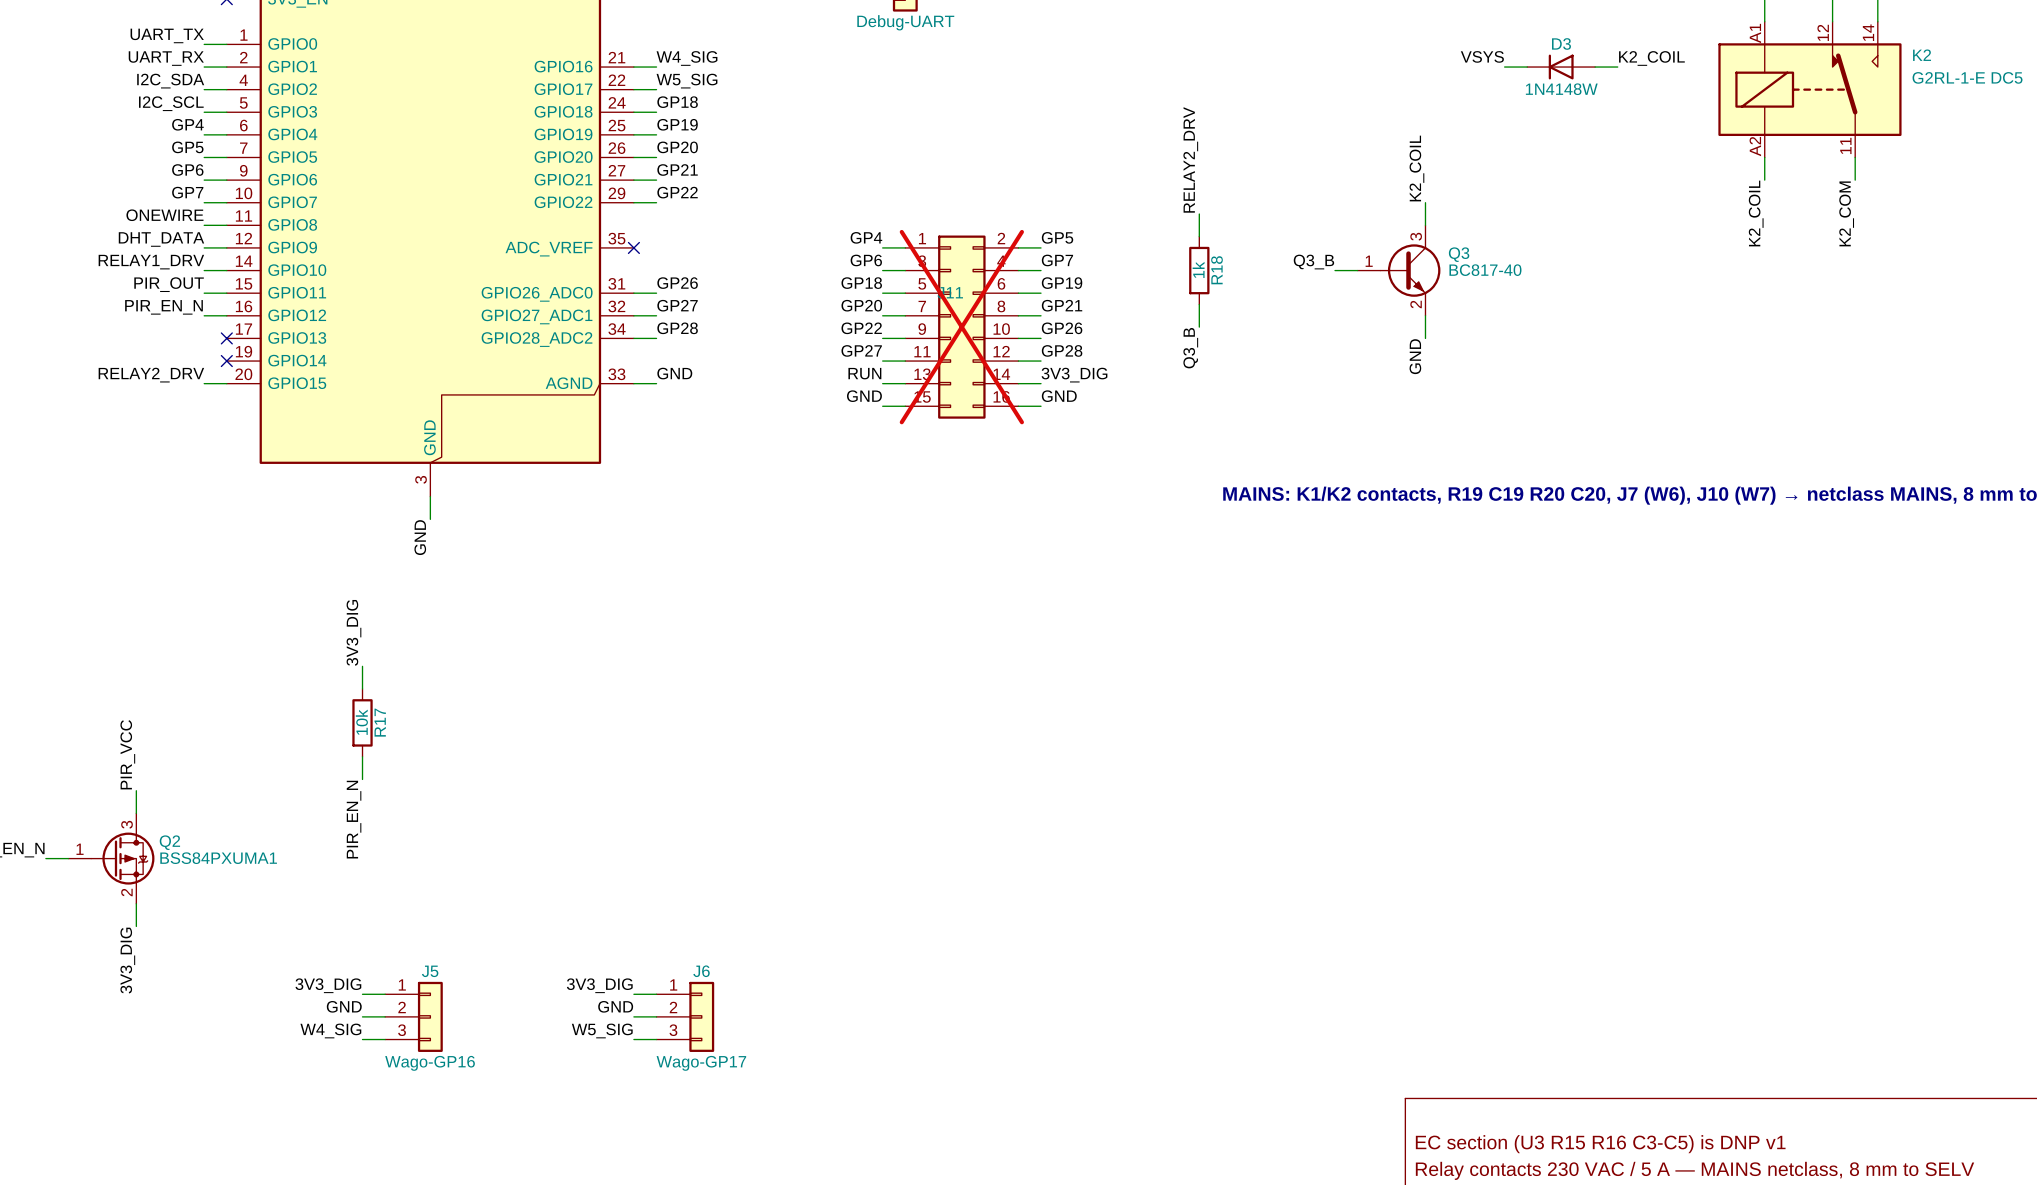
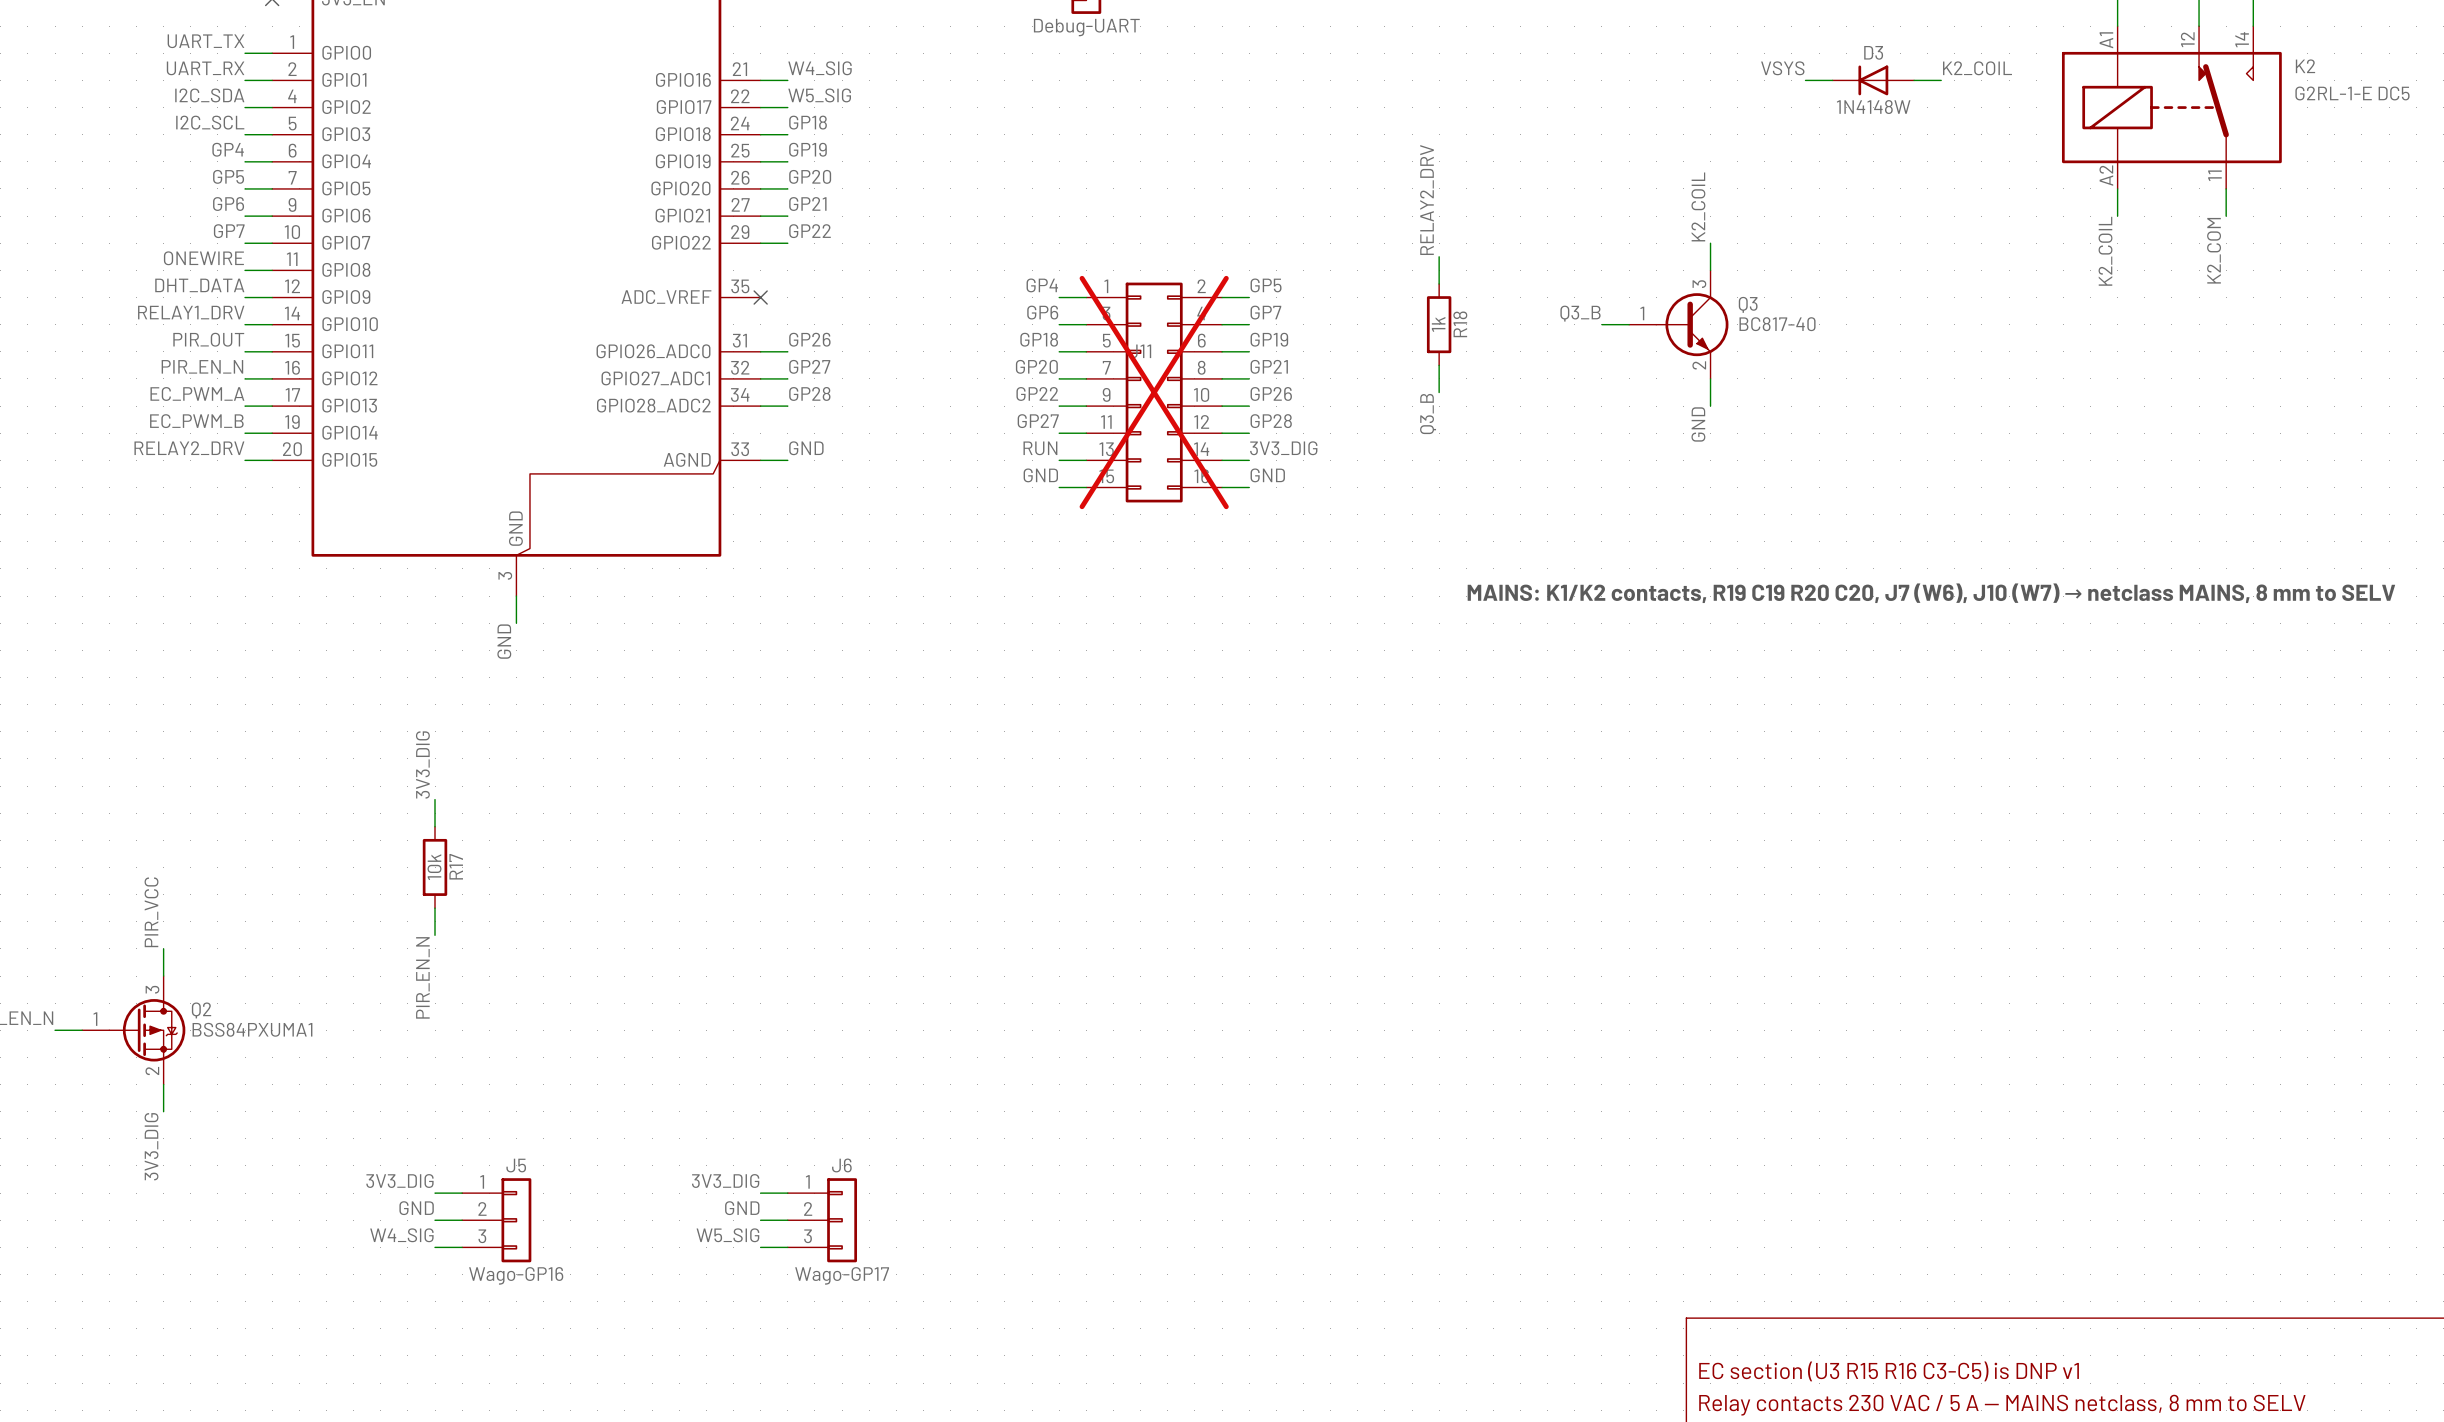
label: none -> EC_PWM_A (197, 393)
wire: none -> (245, 406) (272, 406)
no-connect mark: (226, 338) -> none
label: none -> EC_PWM_B (196, 421)
wire: none -> (245, 433) (272, 433)
no-connect mark: (226, 361) -> none

